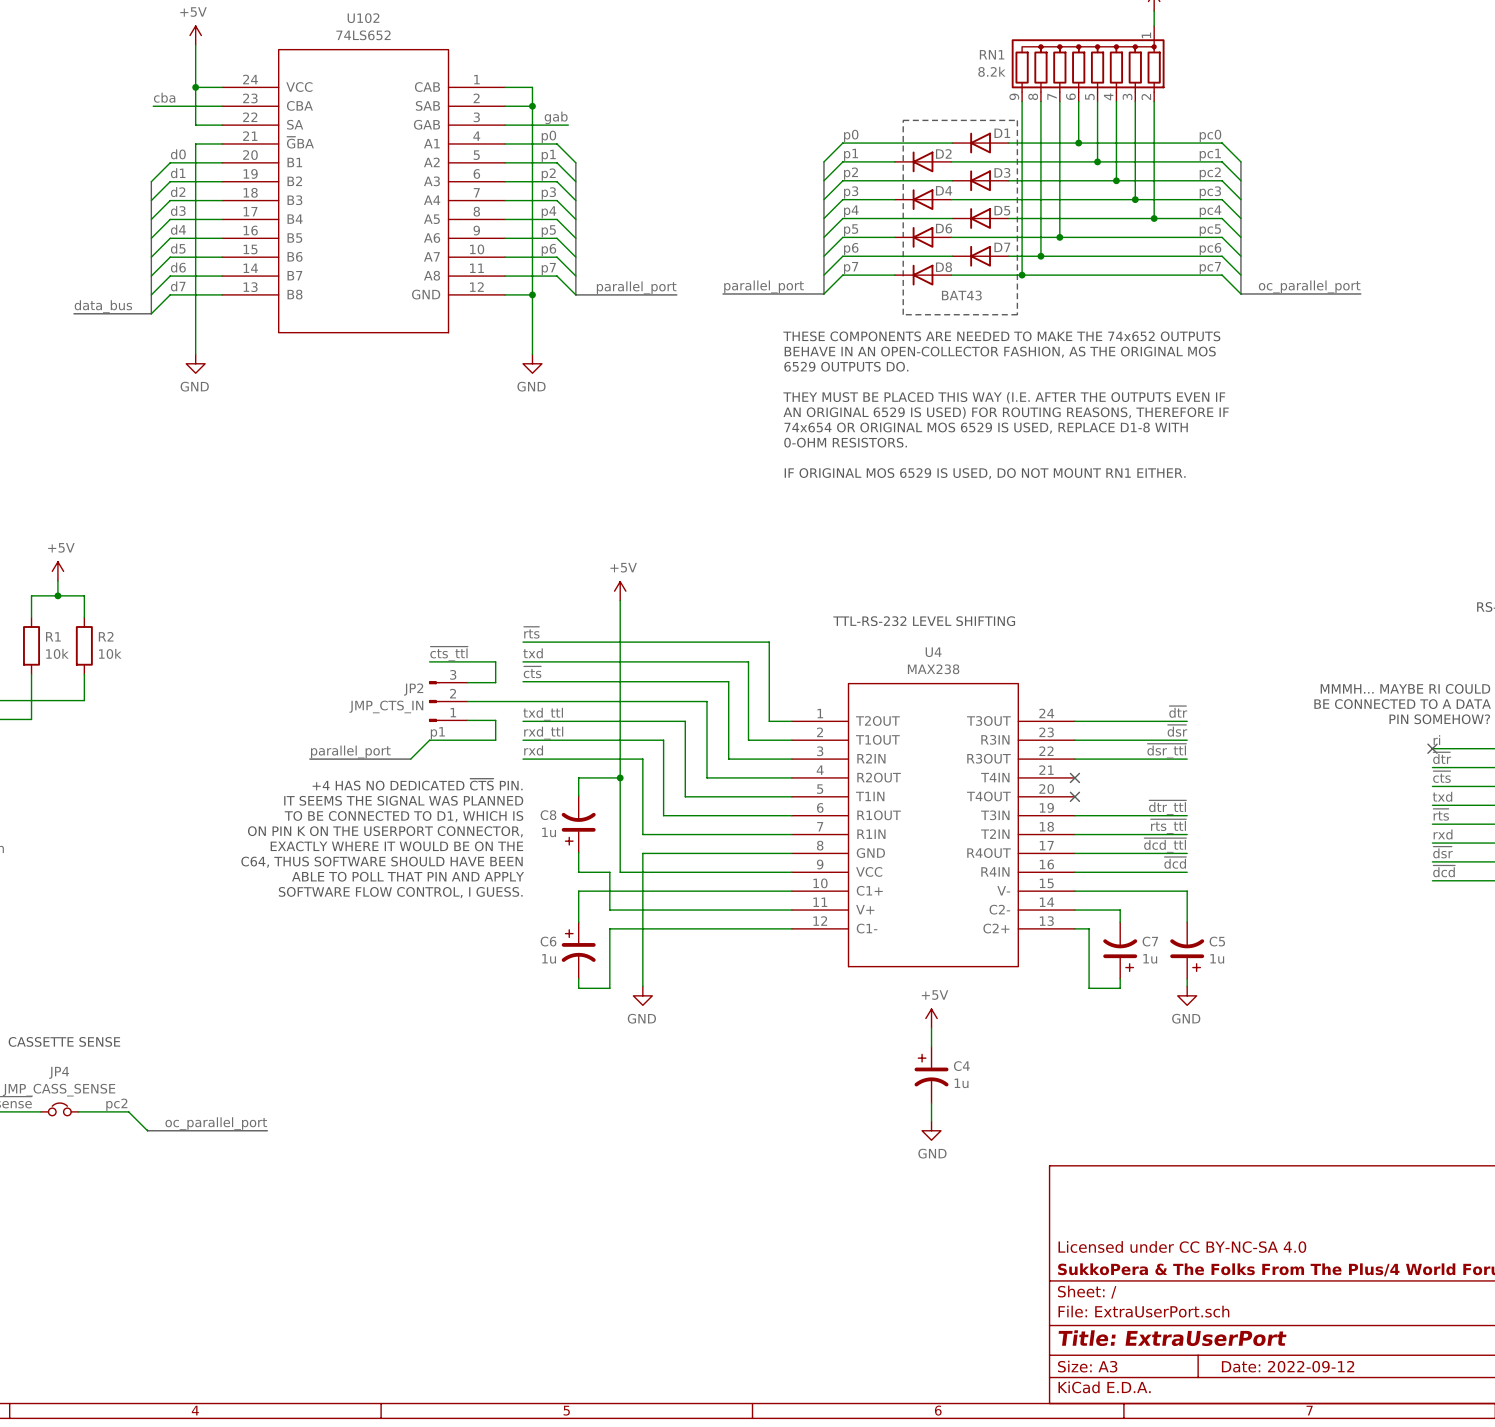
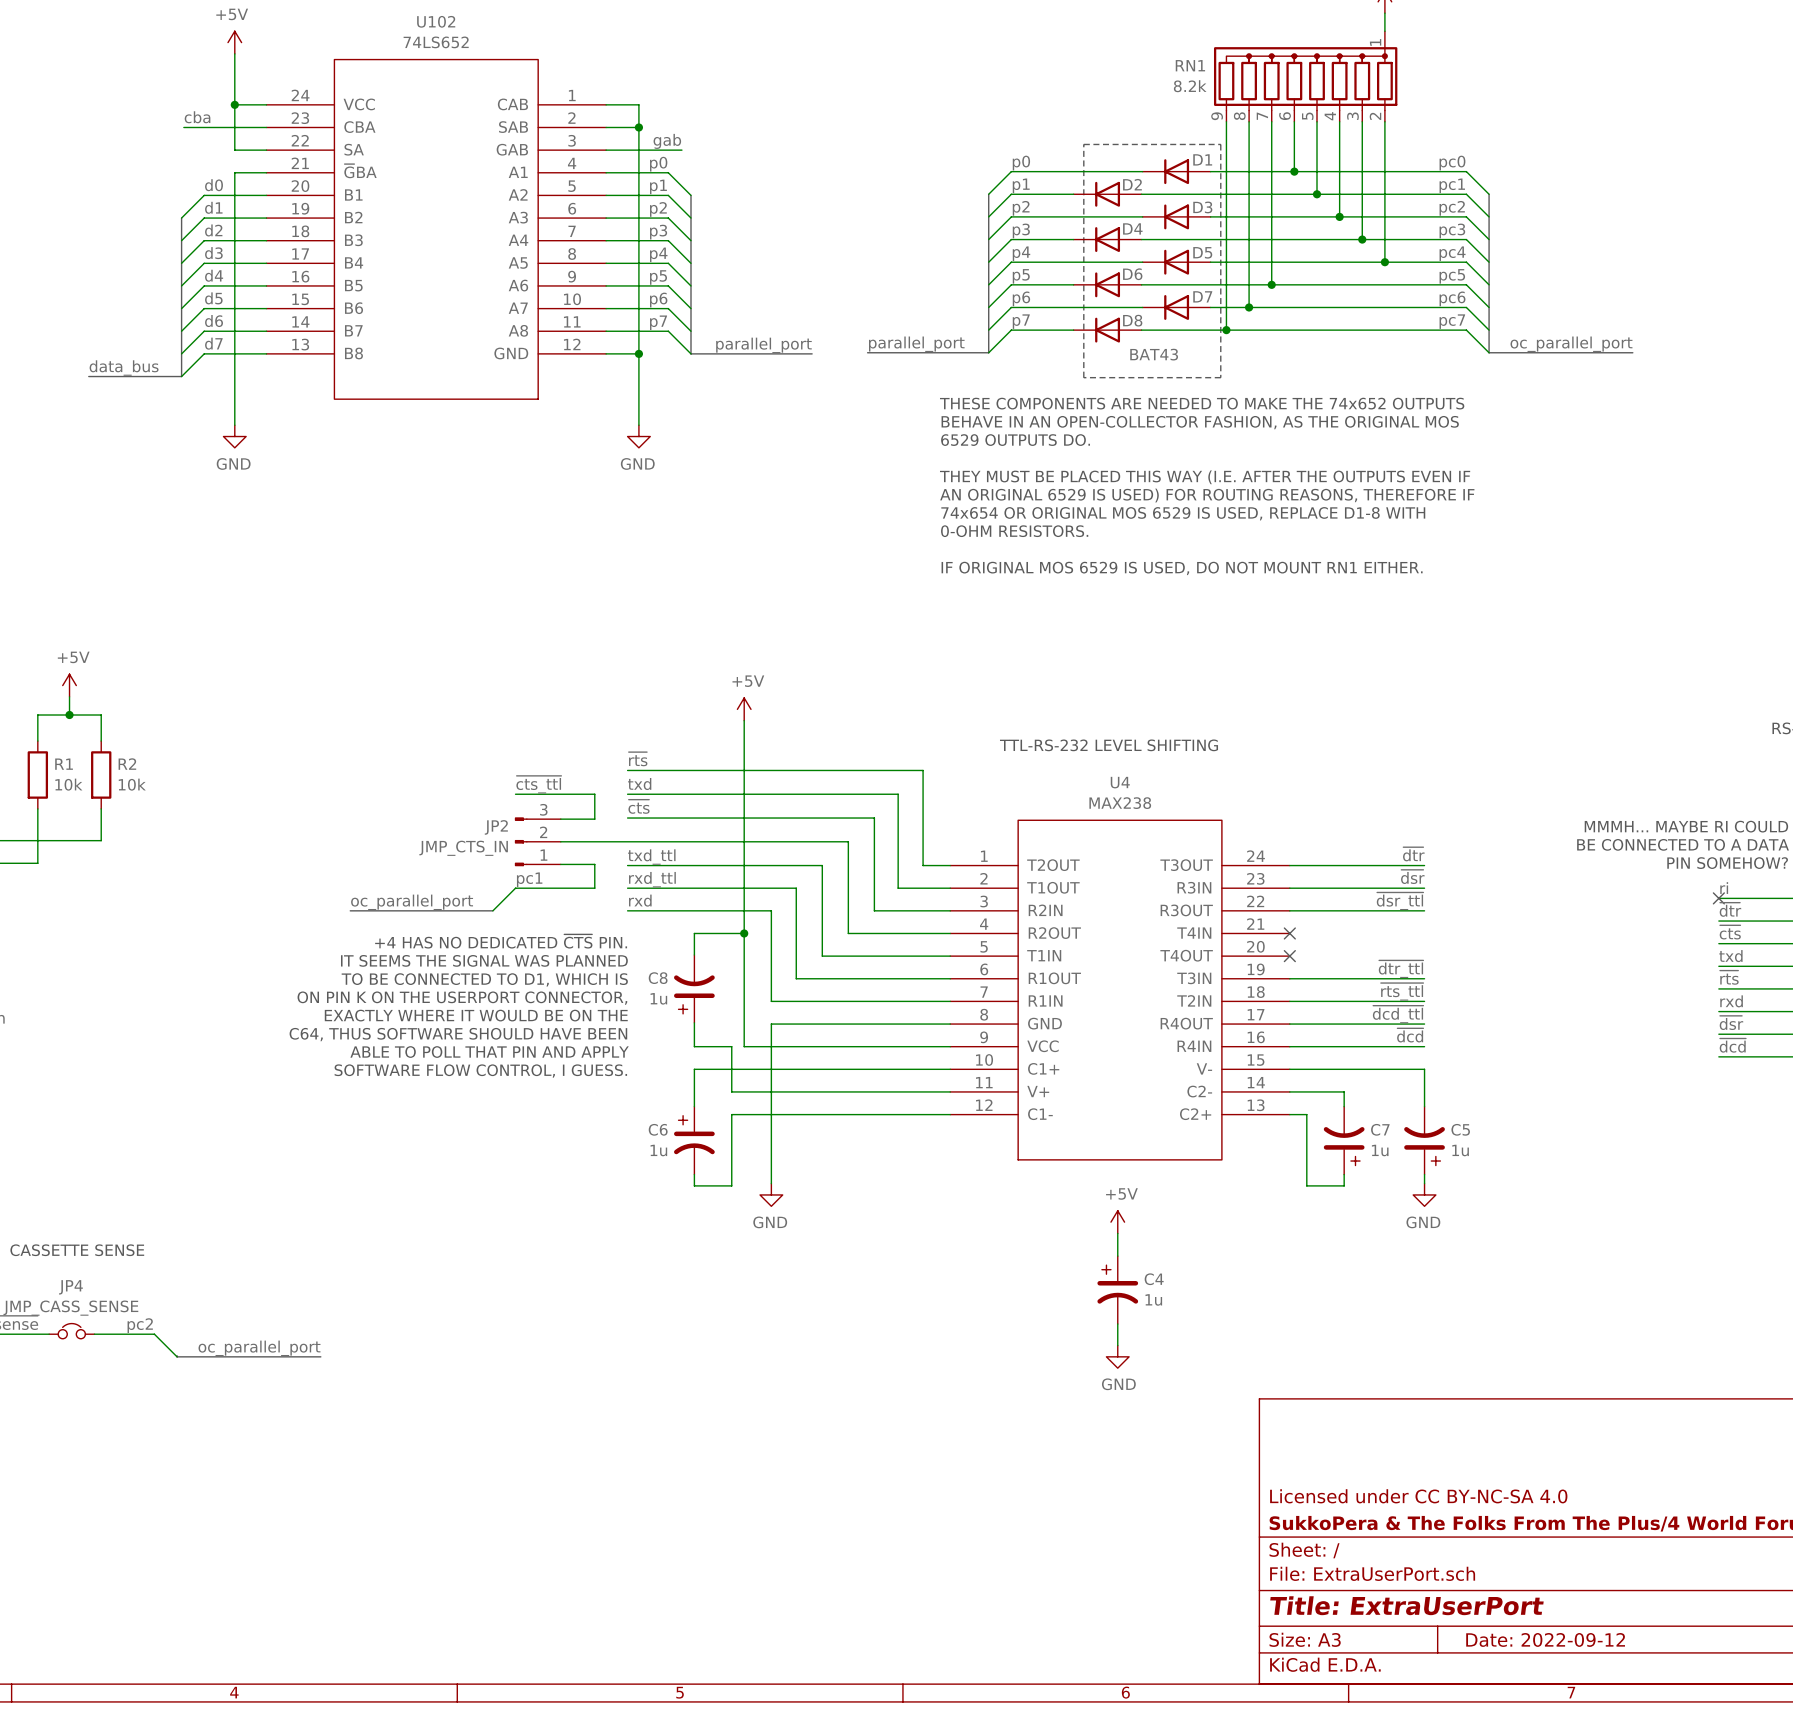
label: p1 (437, 733) -> pc1 (529, 879)
label: parallel_port (350, 751) -> oc_parallel_port (412, 902)
bus: none -> (350, 910) (371, 910)

